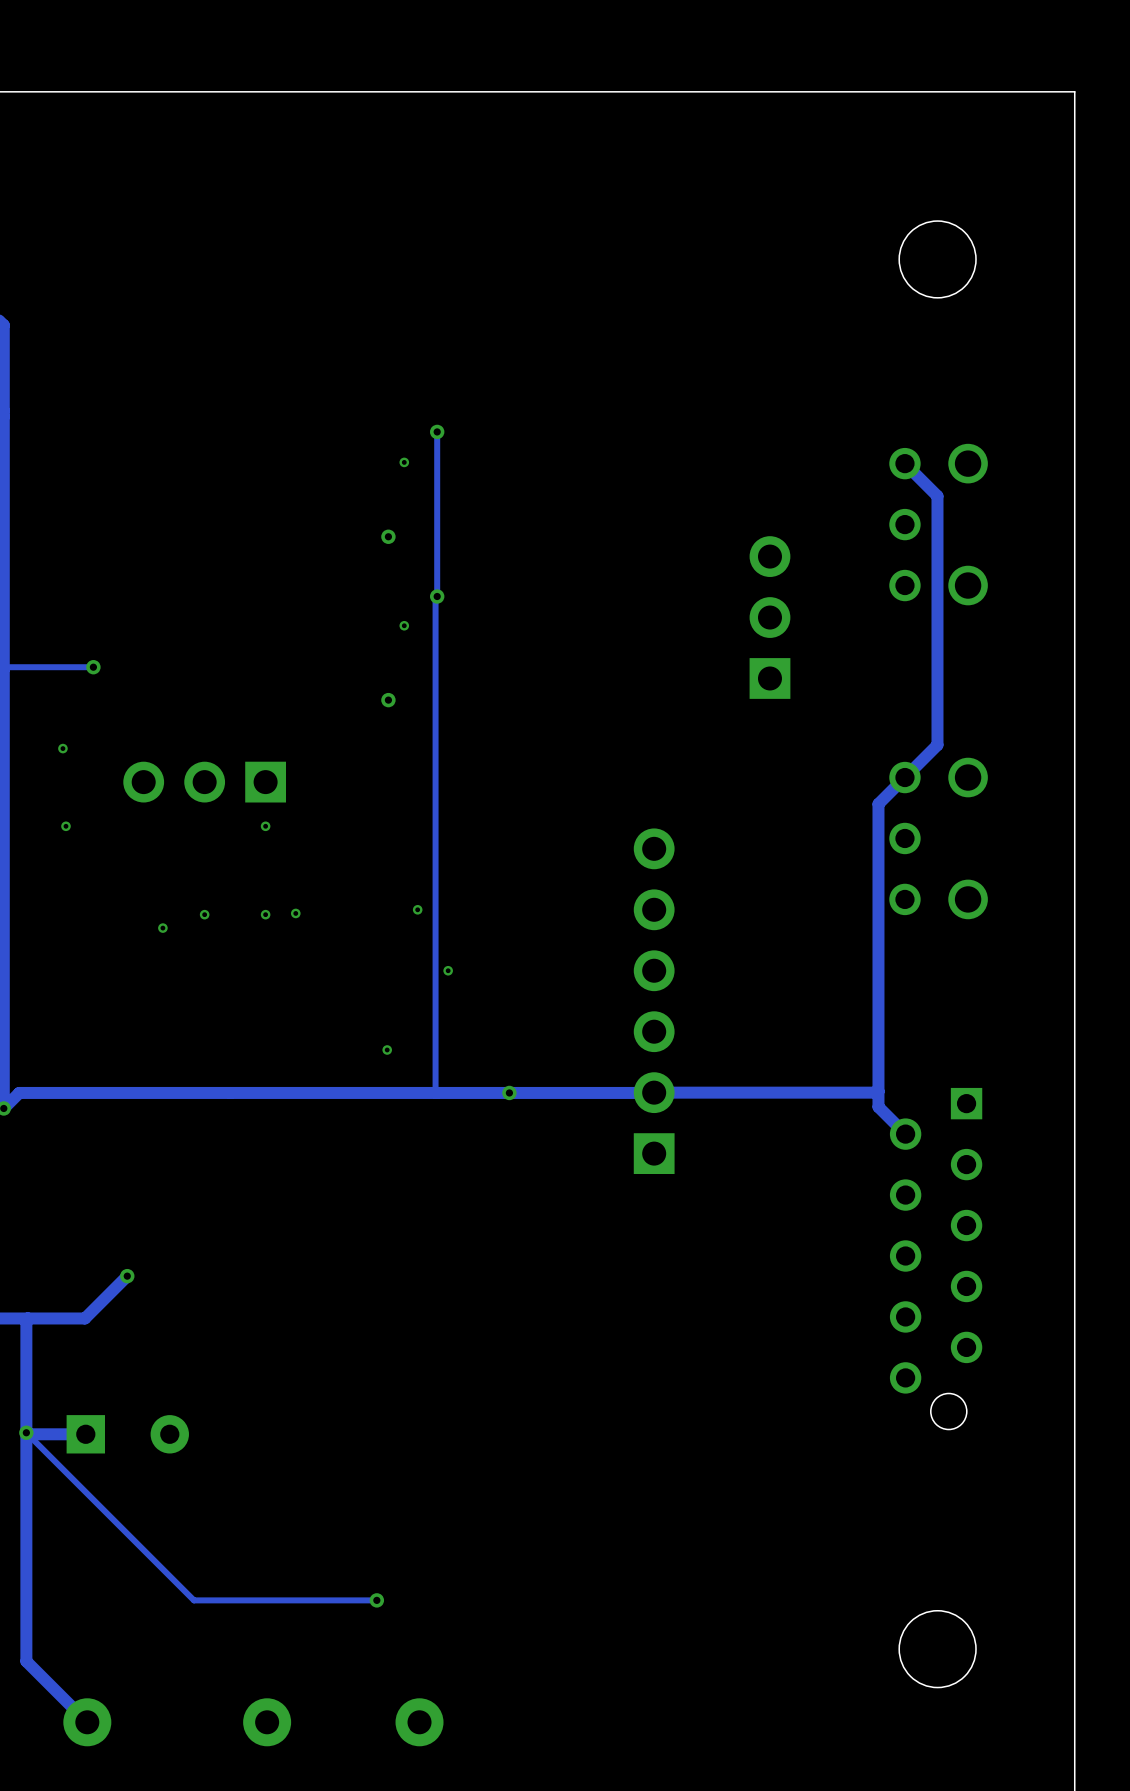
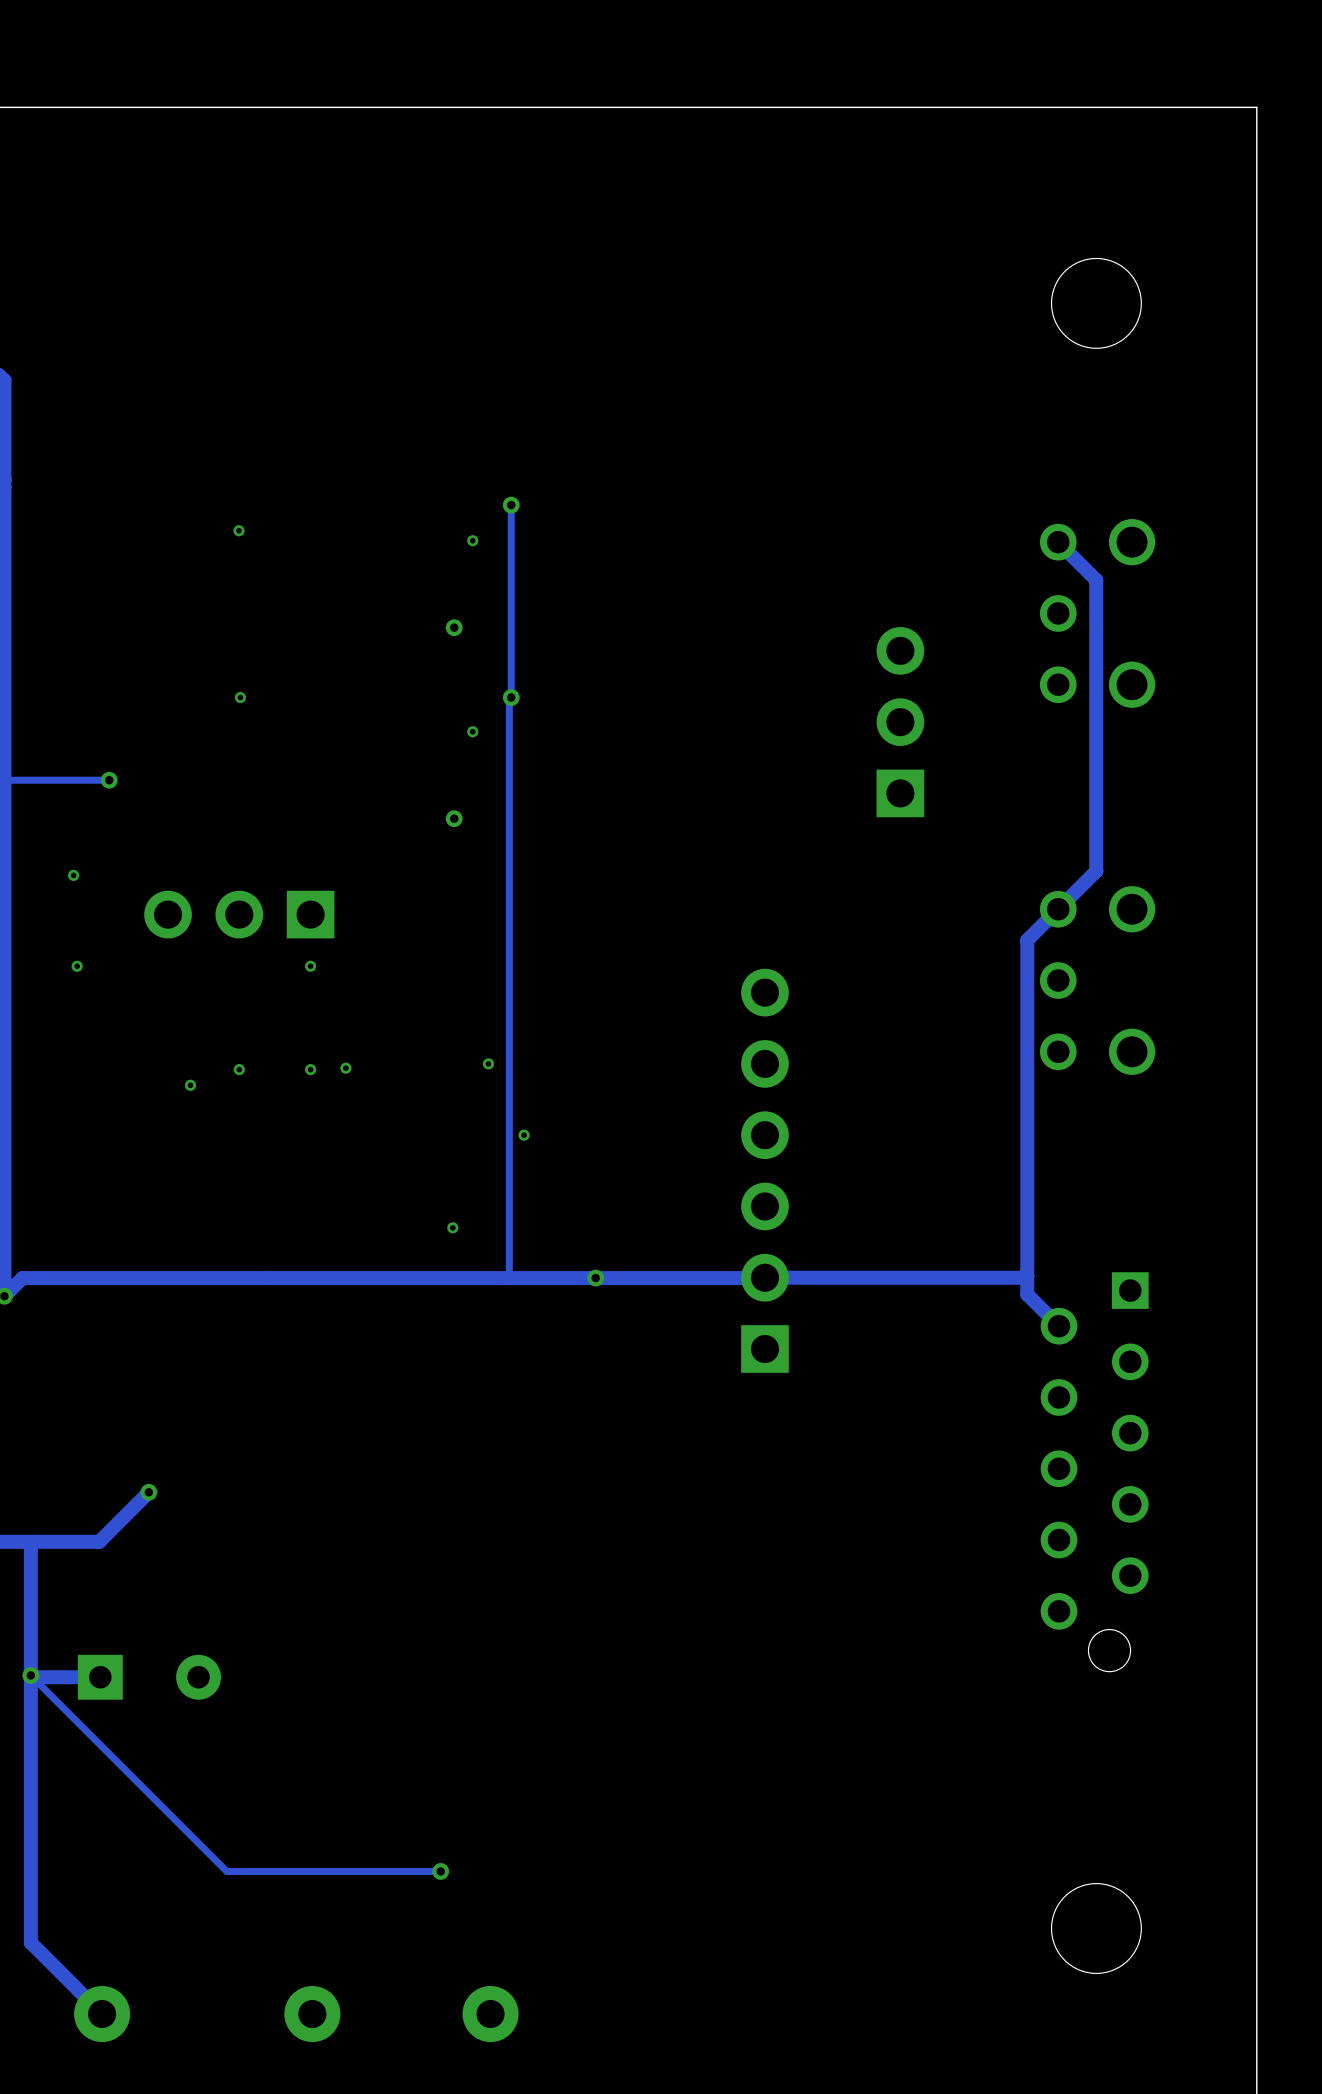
via: none -> (238, 530)
via: none -> (240, 697)

